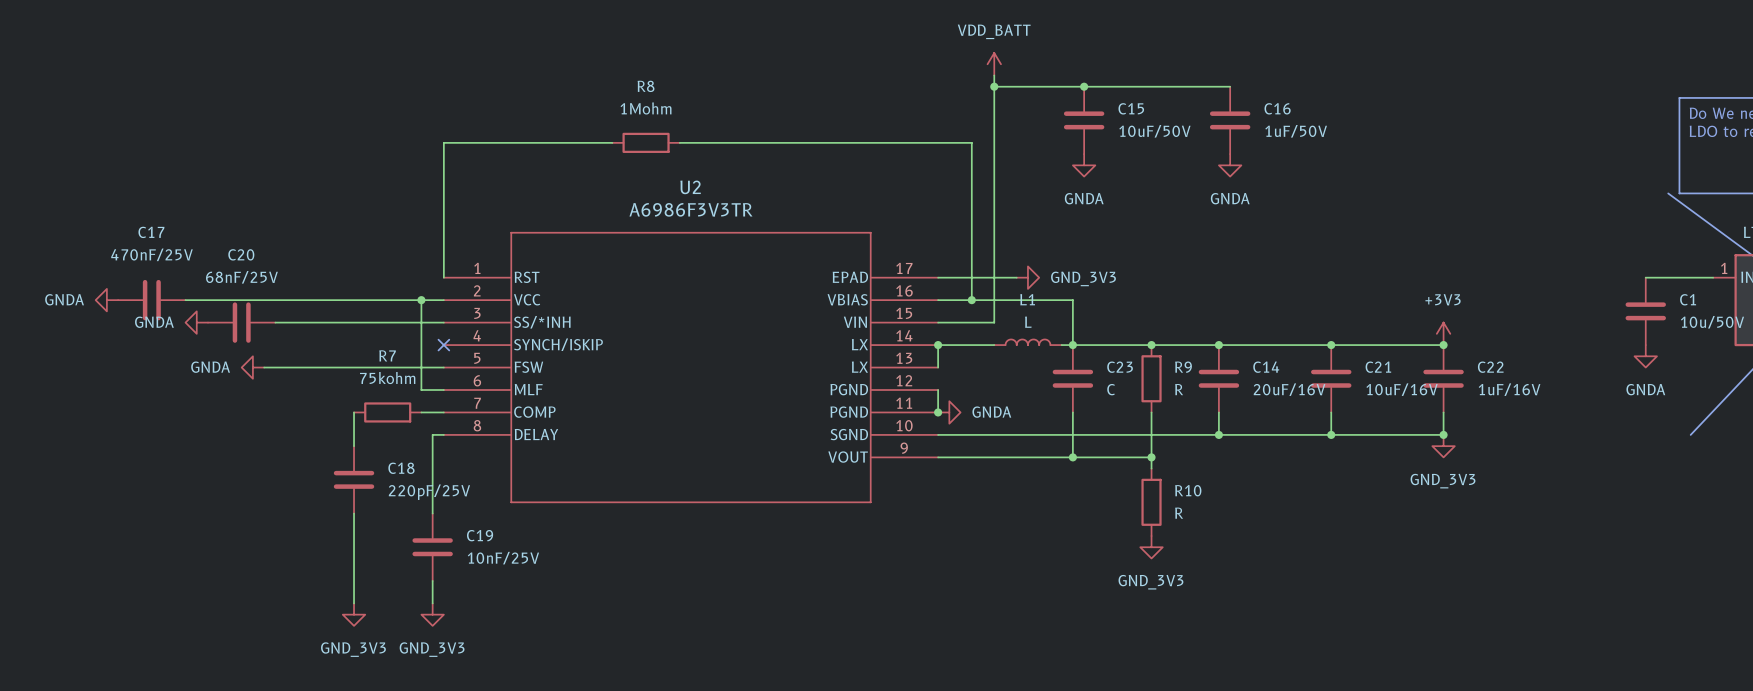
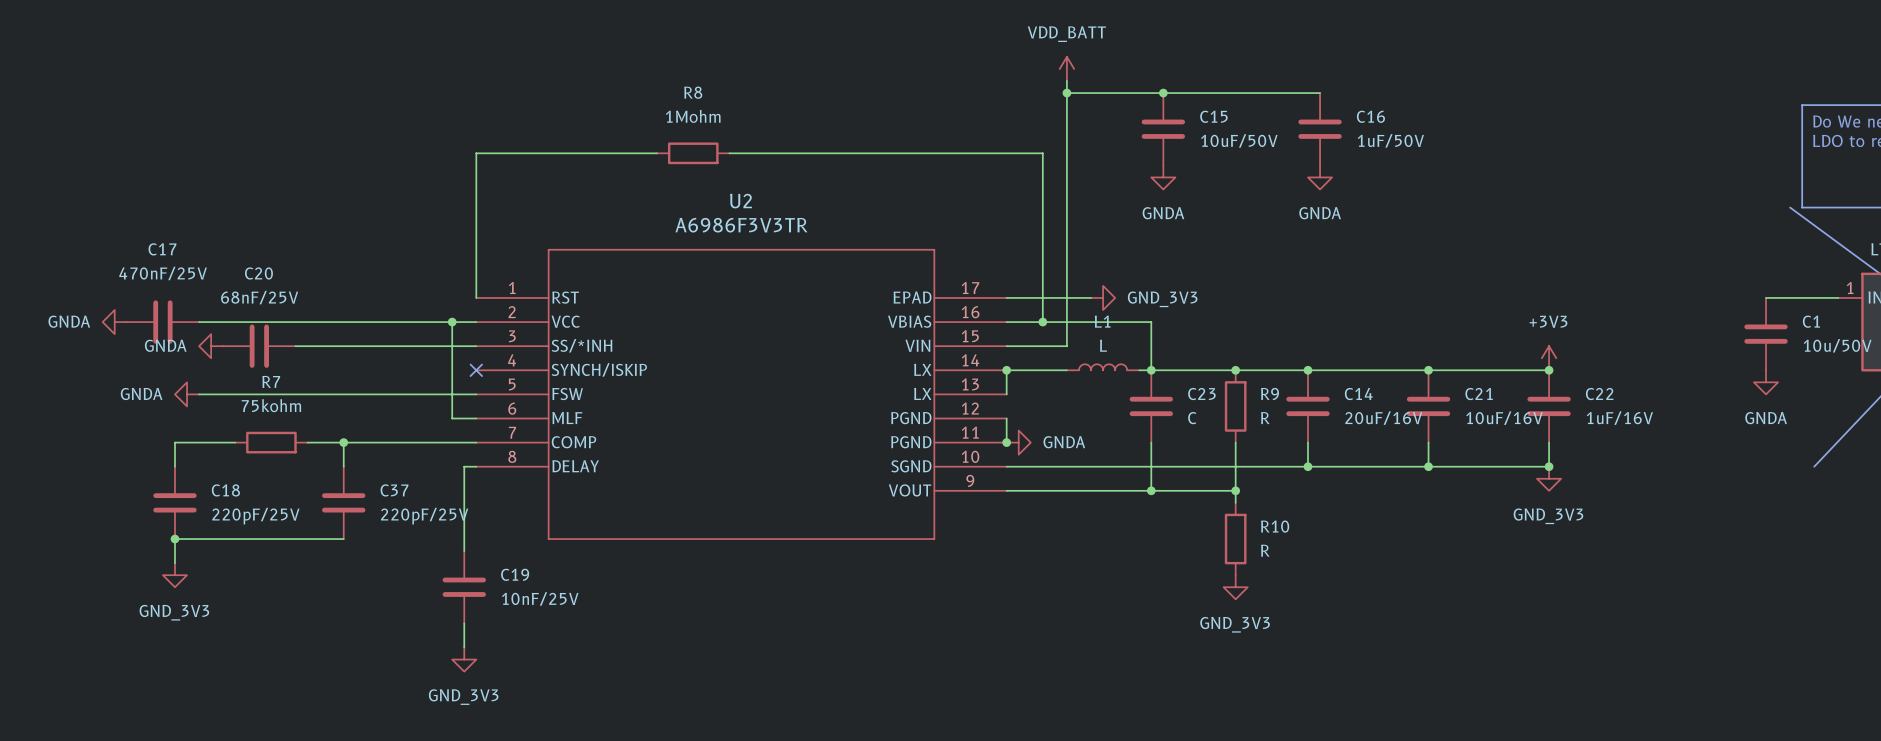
wire: none -> (199, 394) (283, 394)
power symbol position: GNDA (252, 367) -> GNDA (187, 394)
wire: none -> (235, 442) (174, 442) (174, 466)
wire: none -> (307, 442) (452, 442)
wire: none -> (343, 442) (343, 466)
junction: none -> (343, 442)
wire: (354, 412) (354, 446) -> none
R7 position: (387, 412) -> (271, 442)
C37: none -> 220pF/25V (343, 502)
C18 position: (354, 479) -> (174, 502)
junction: none -> (174, 539)
wire: none -> (343, 539) (174, 539) (174, 563)
wire: (354, 513) (354, 603) -> none
power symbol position: GND_3V3 (354, 614) -> GND_3V3 (174, 575)

